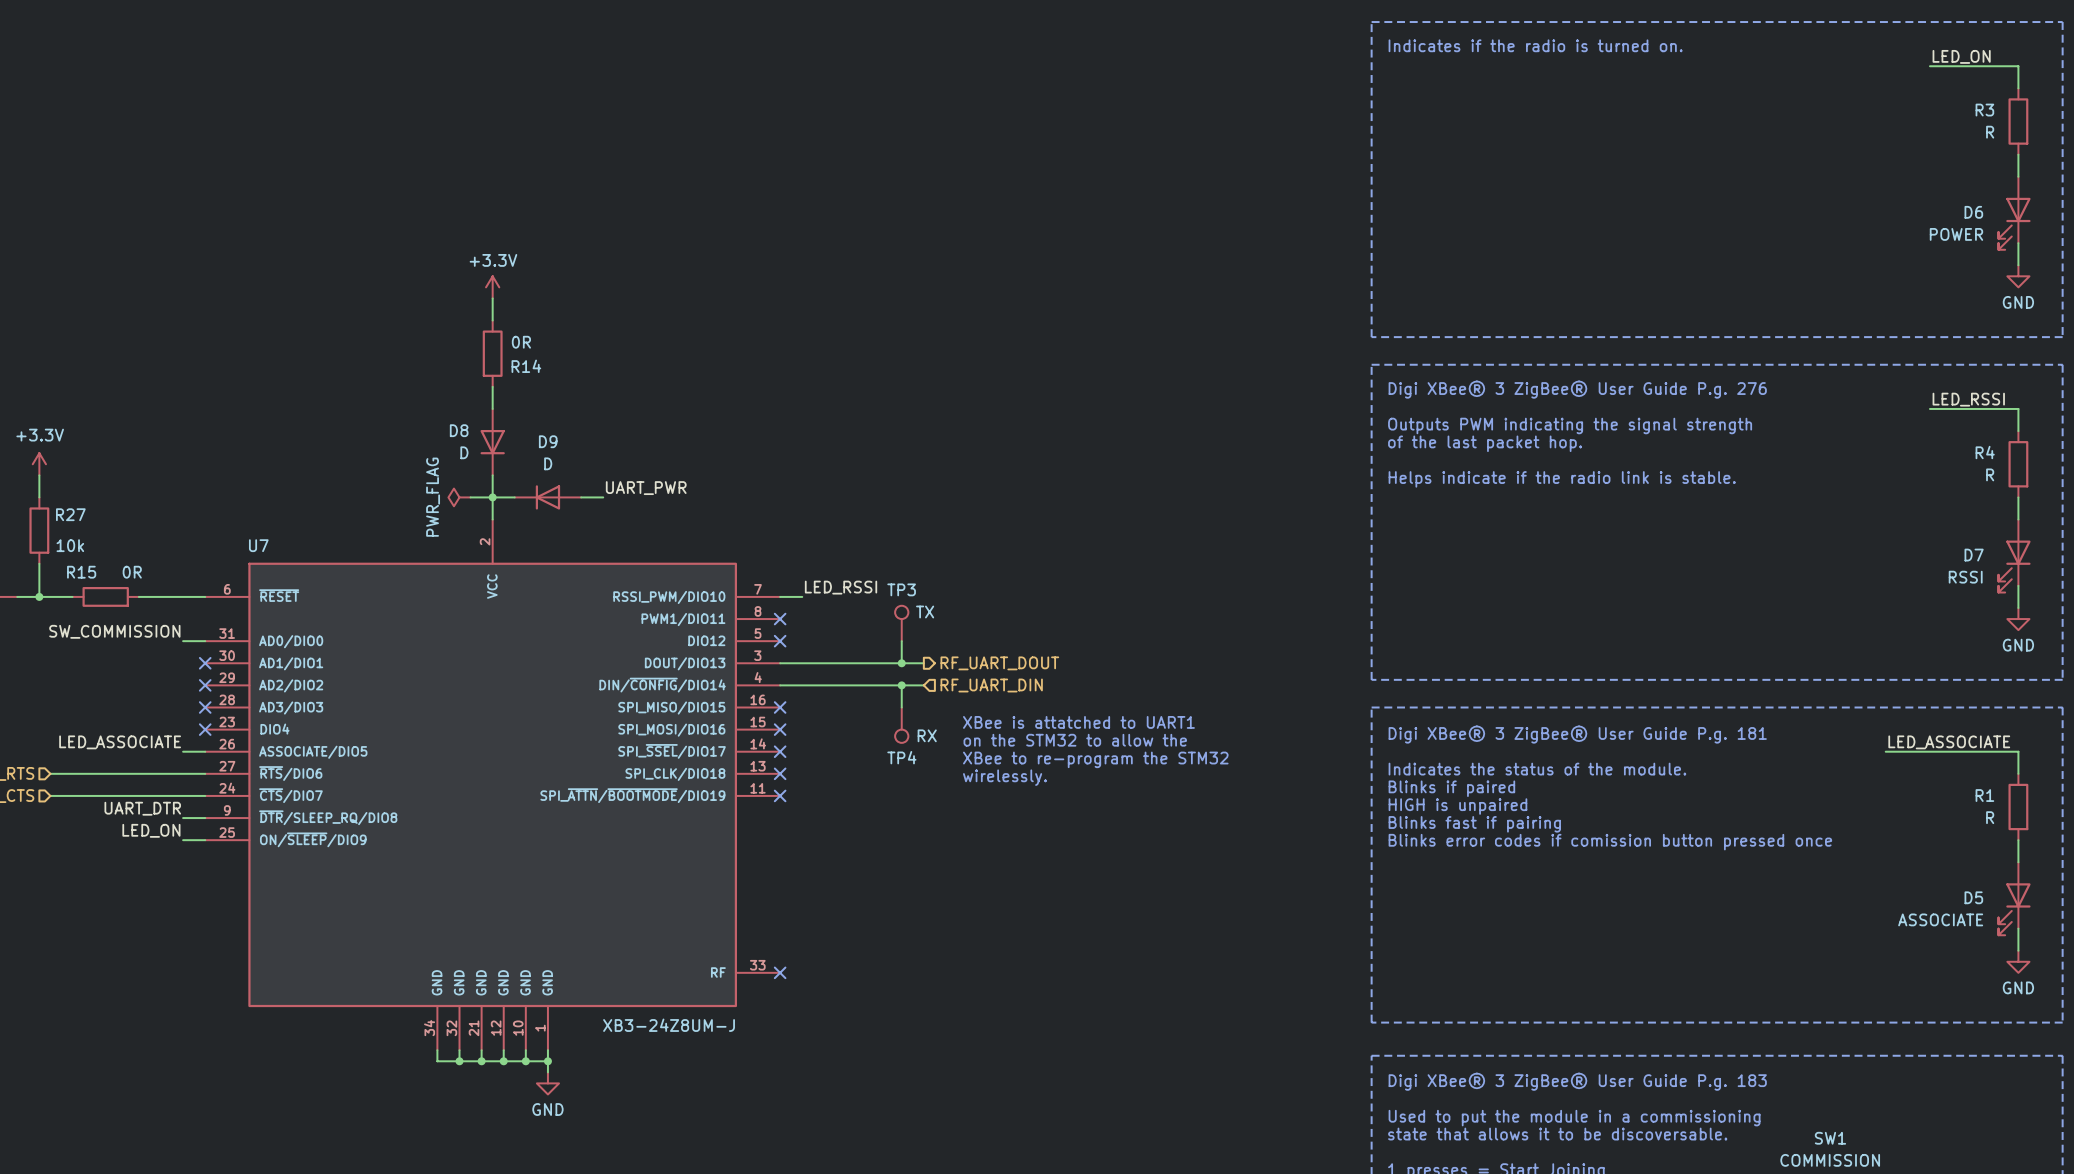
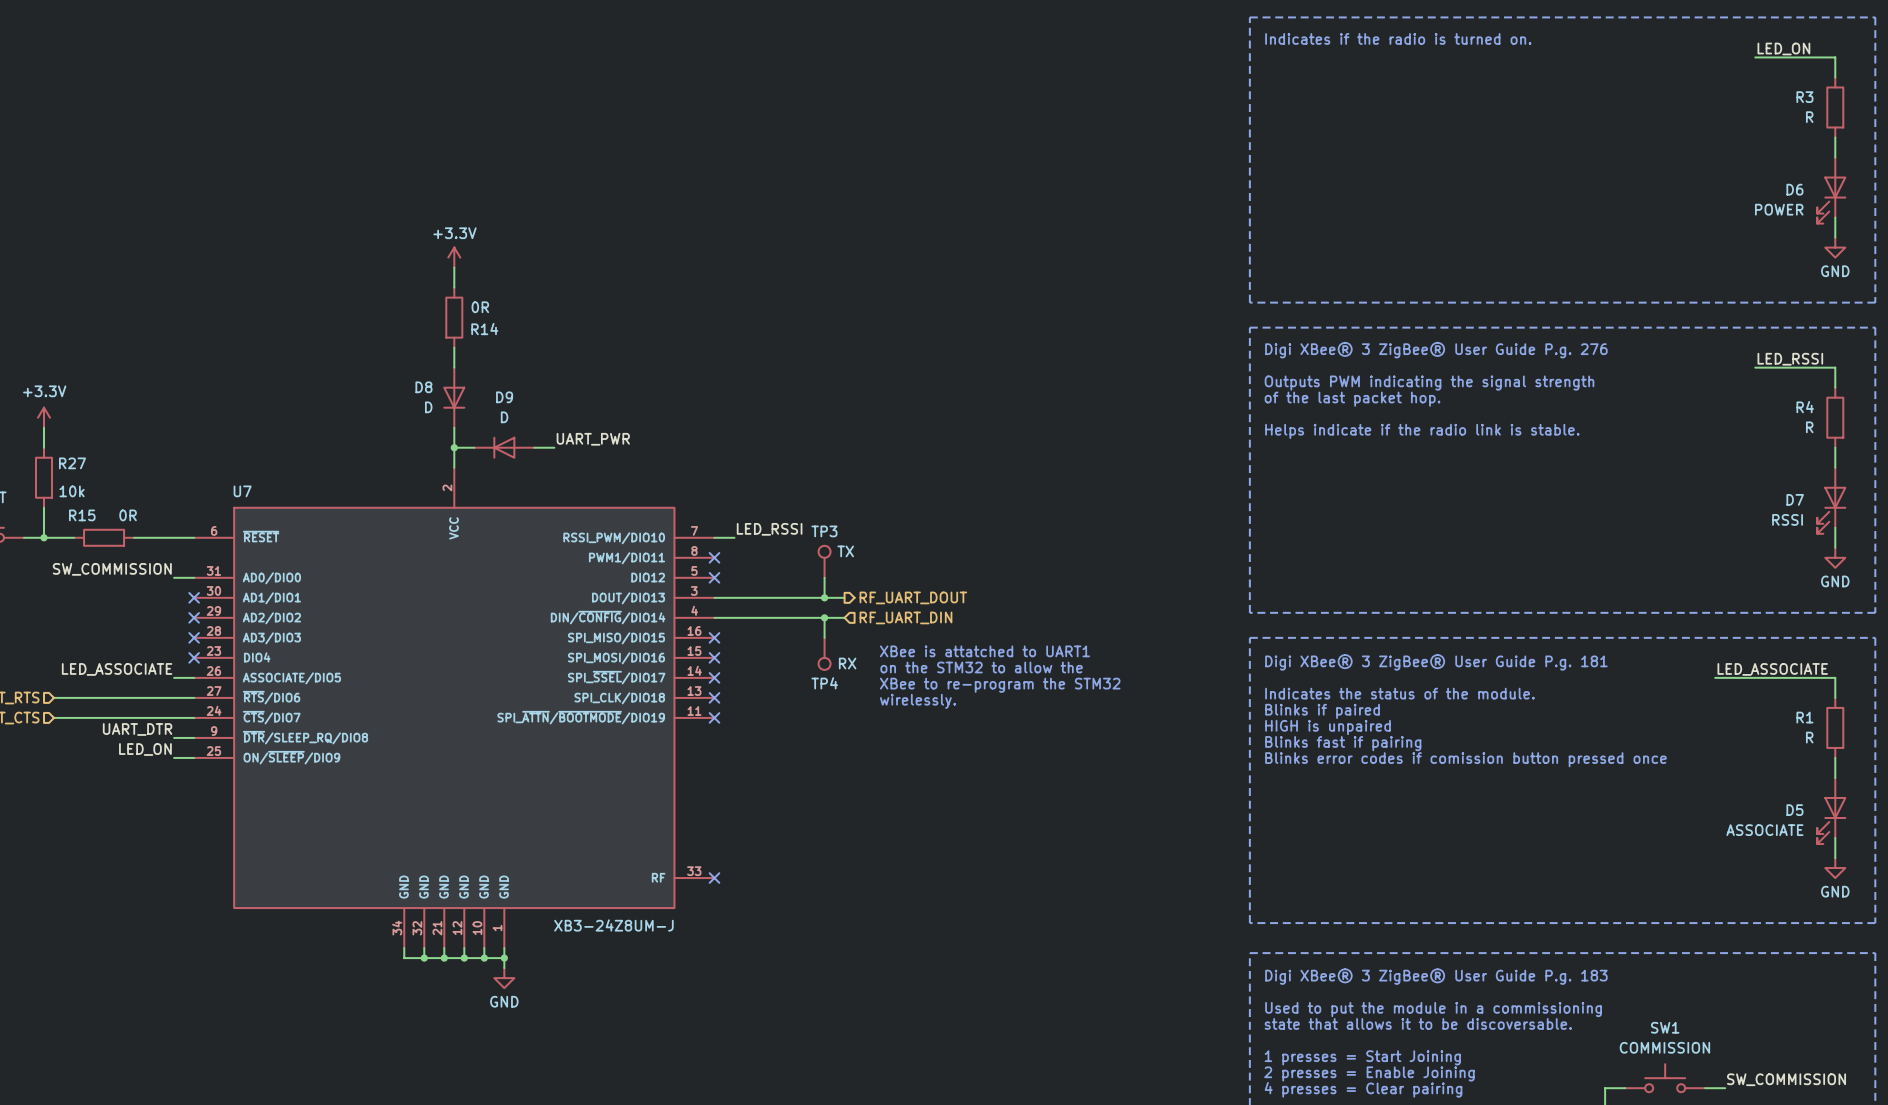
power symbol: PWR_FLAG (459, 497) -> none
wire: (470, 497) (492, 497) -> none

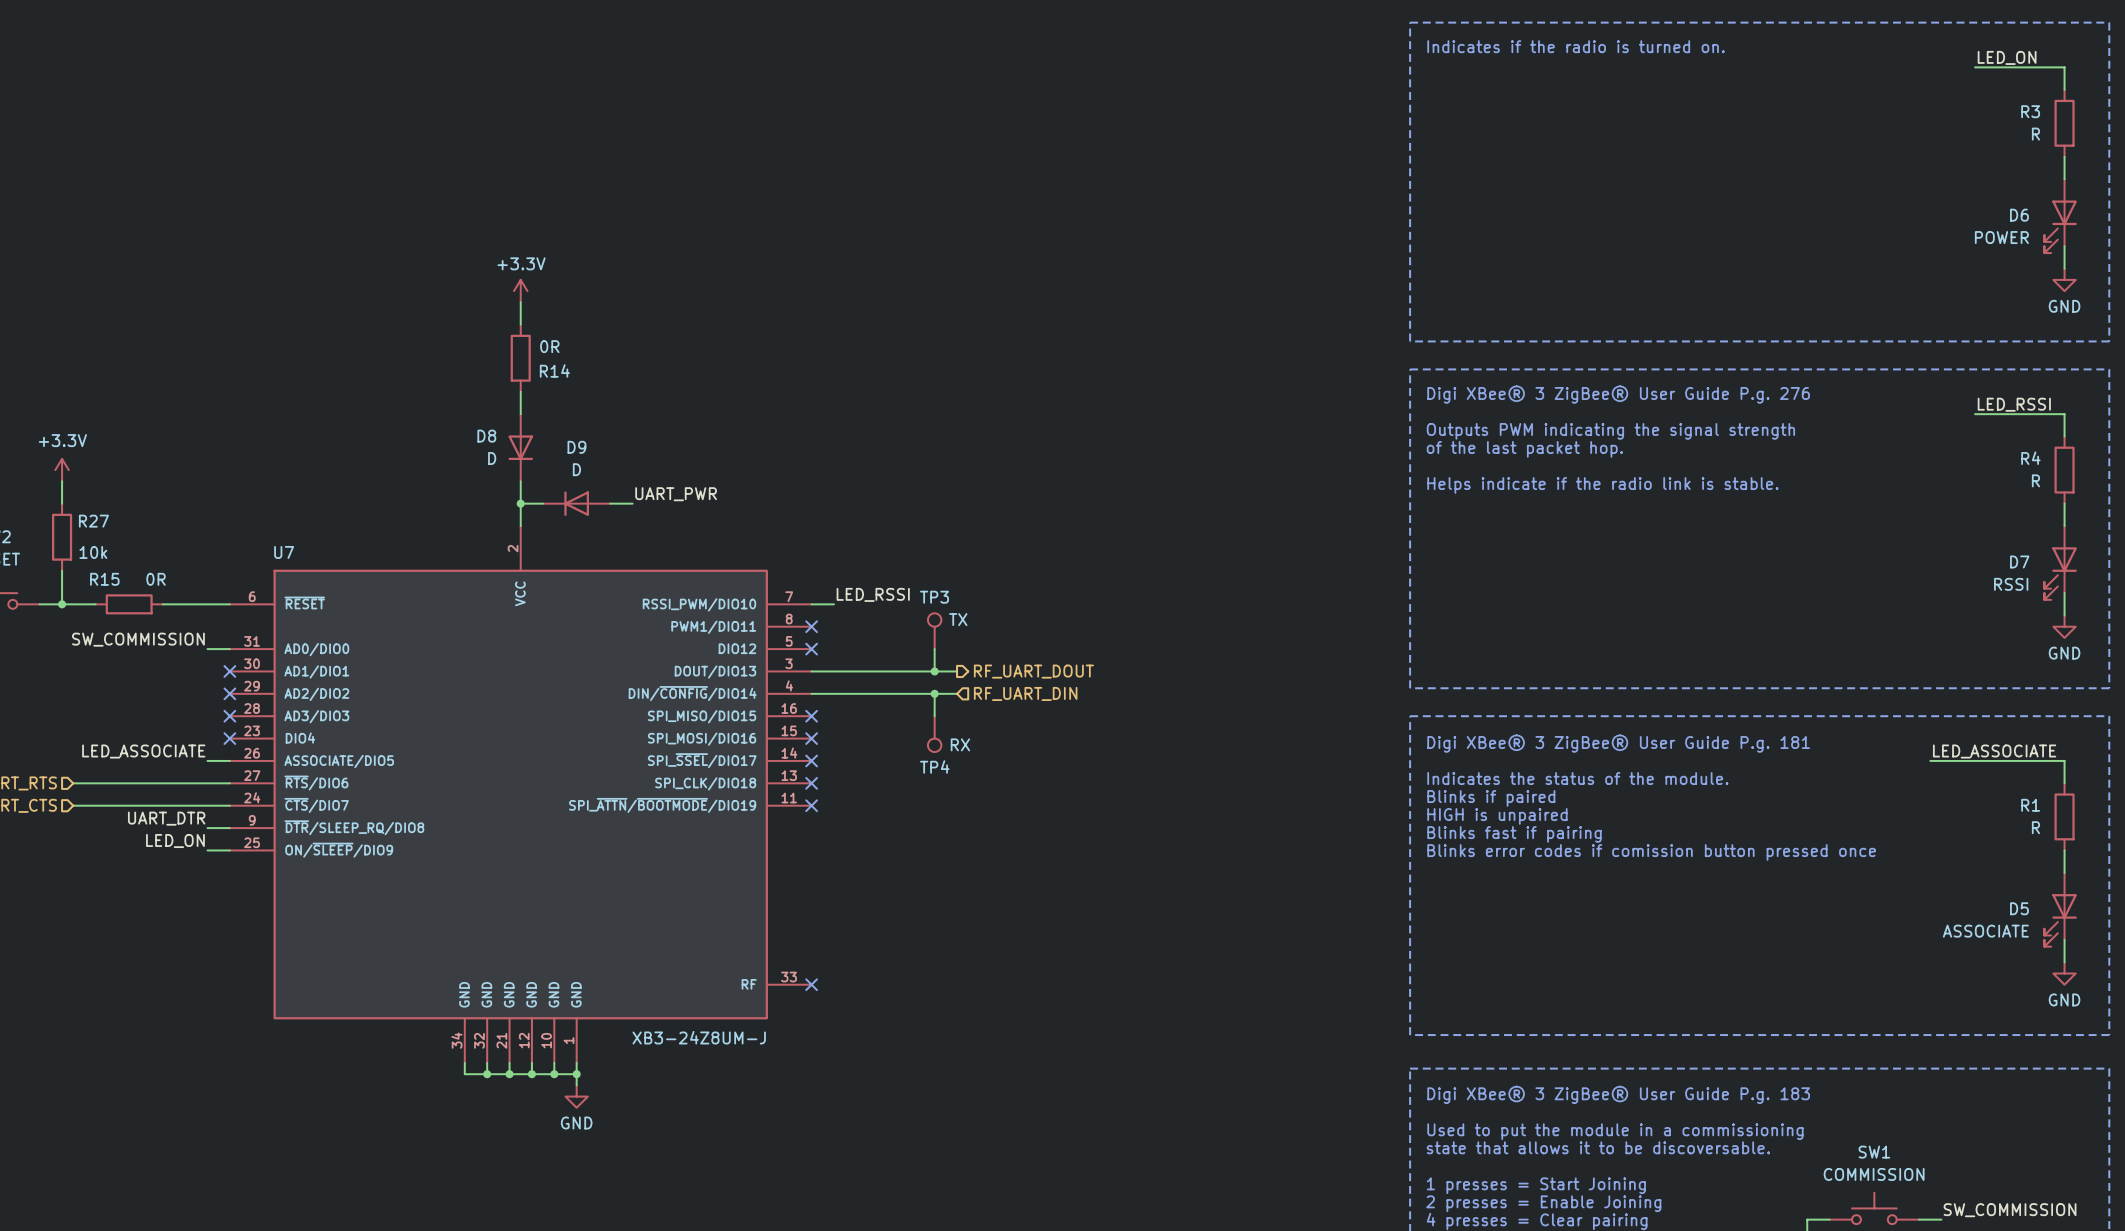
text: XBee is attatched to UART1 (984, 651) -> none
text: on the STM32 to allow the (981, 667) -> none
text: XBee to re-program the STM32 (1000, 685) -> none
text: wirelessly. (917, 701) -> none

